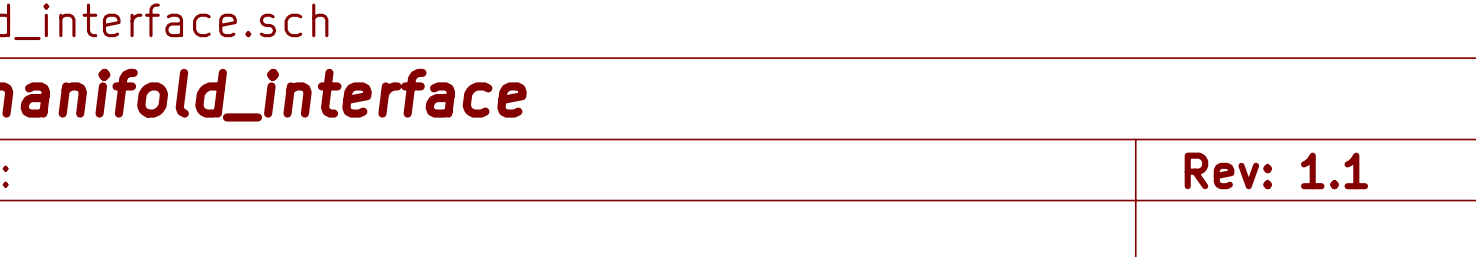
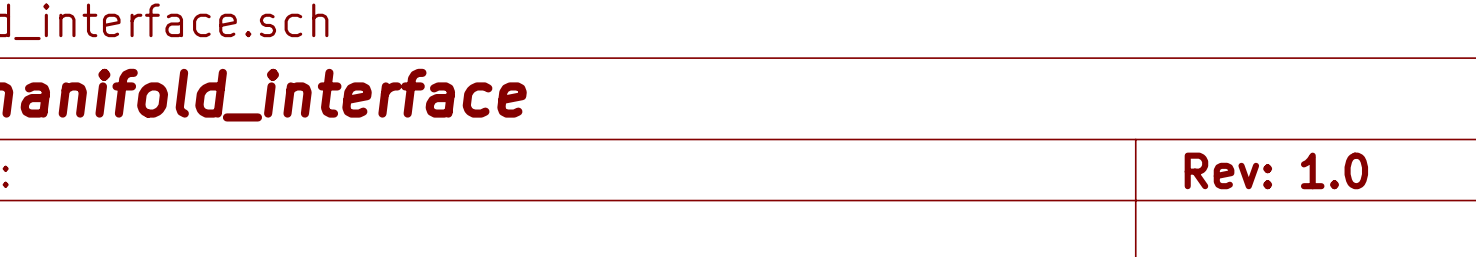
title block: Rev: 1.1 (1276, 170) -> Rev: 1.0 (1276, 170)

